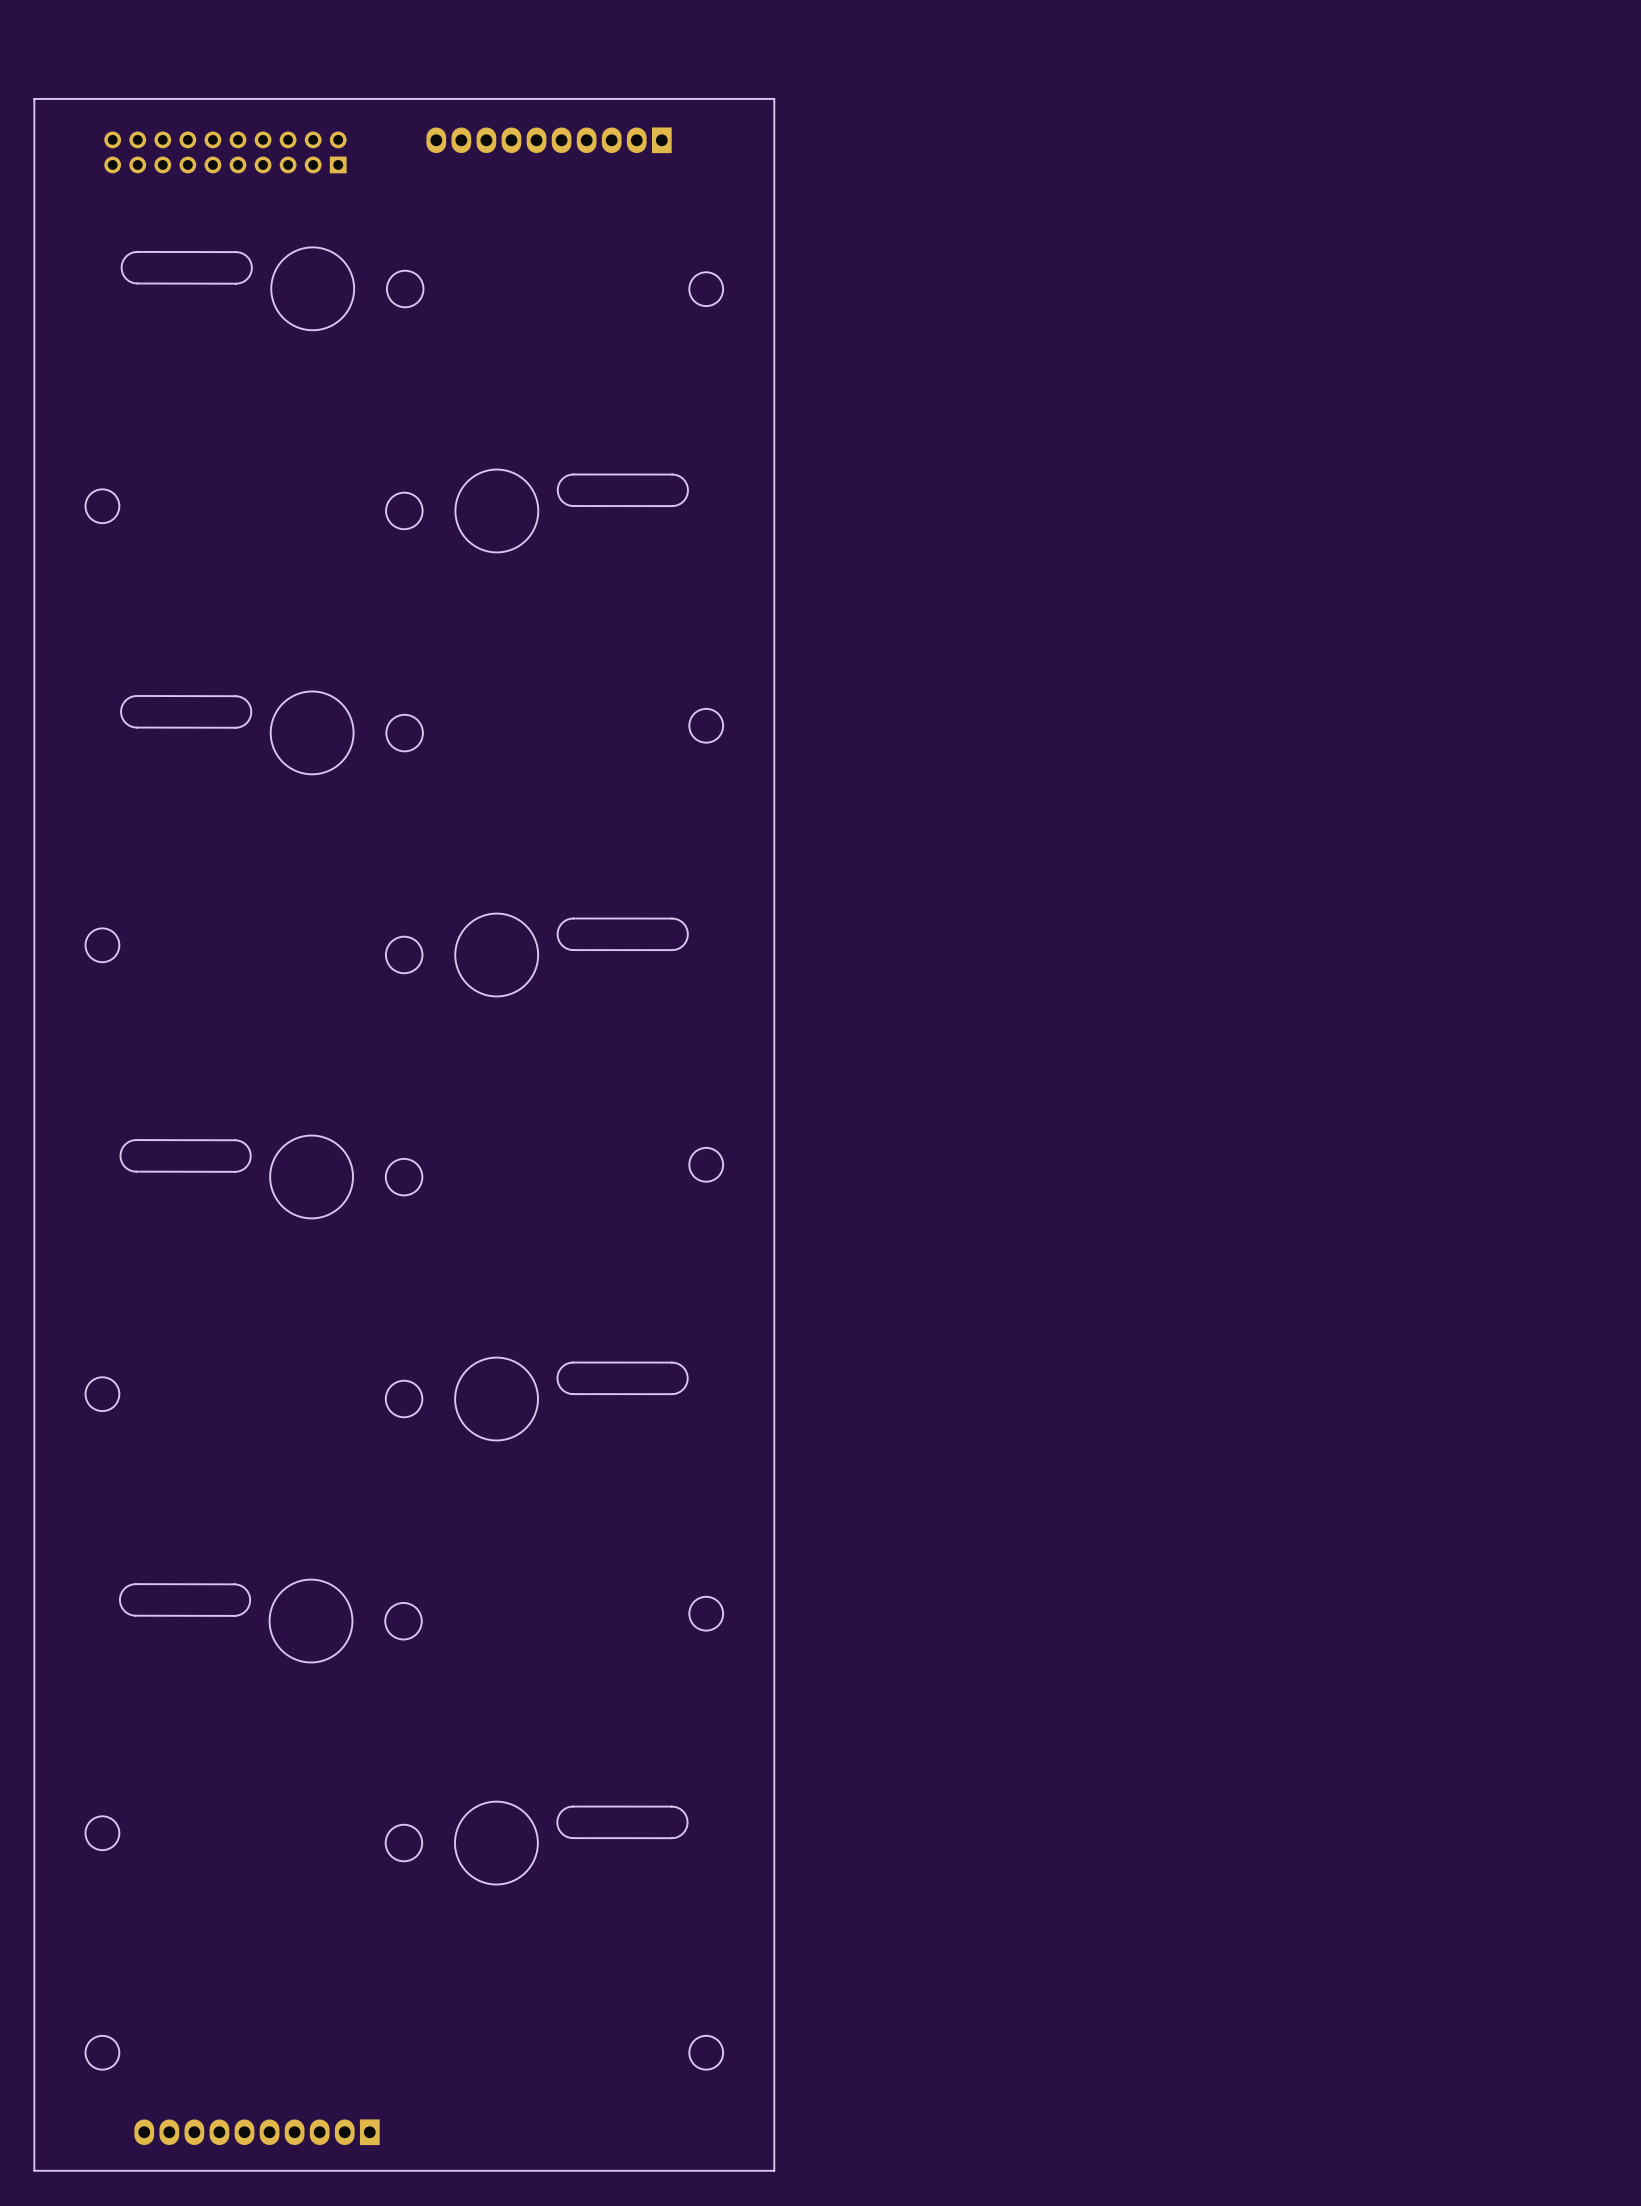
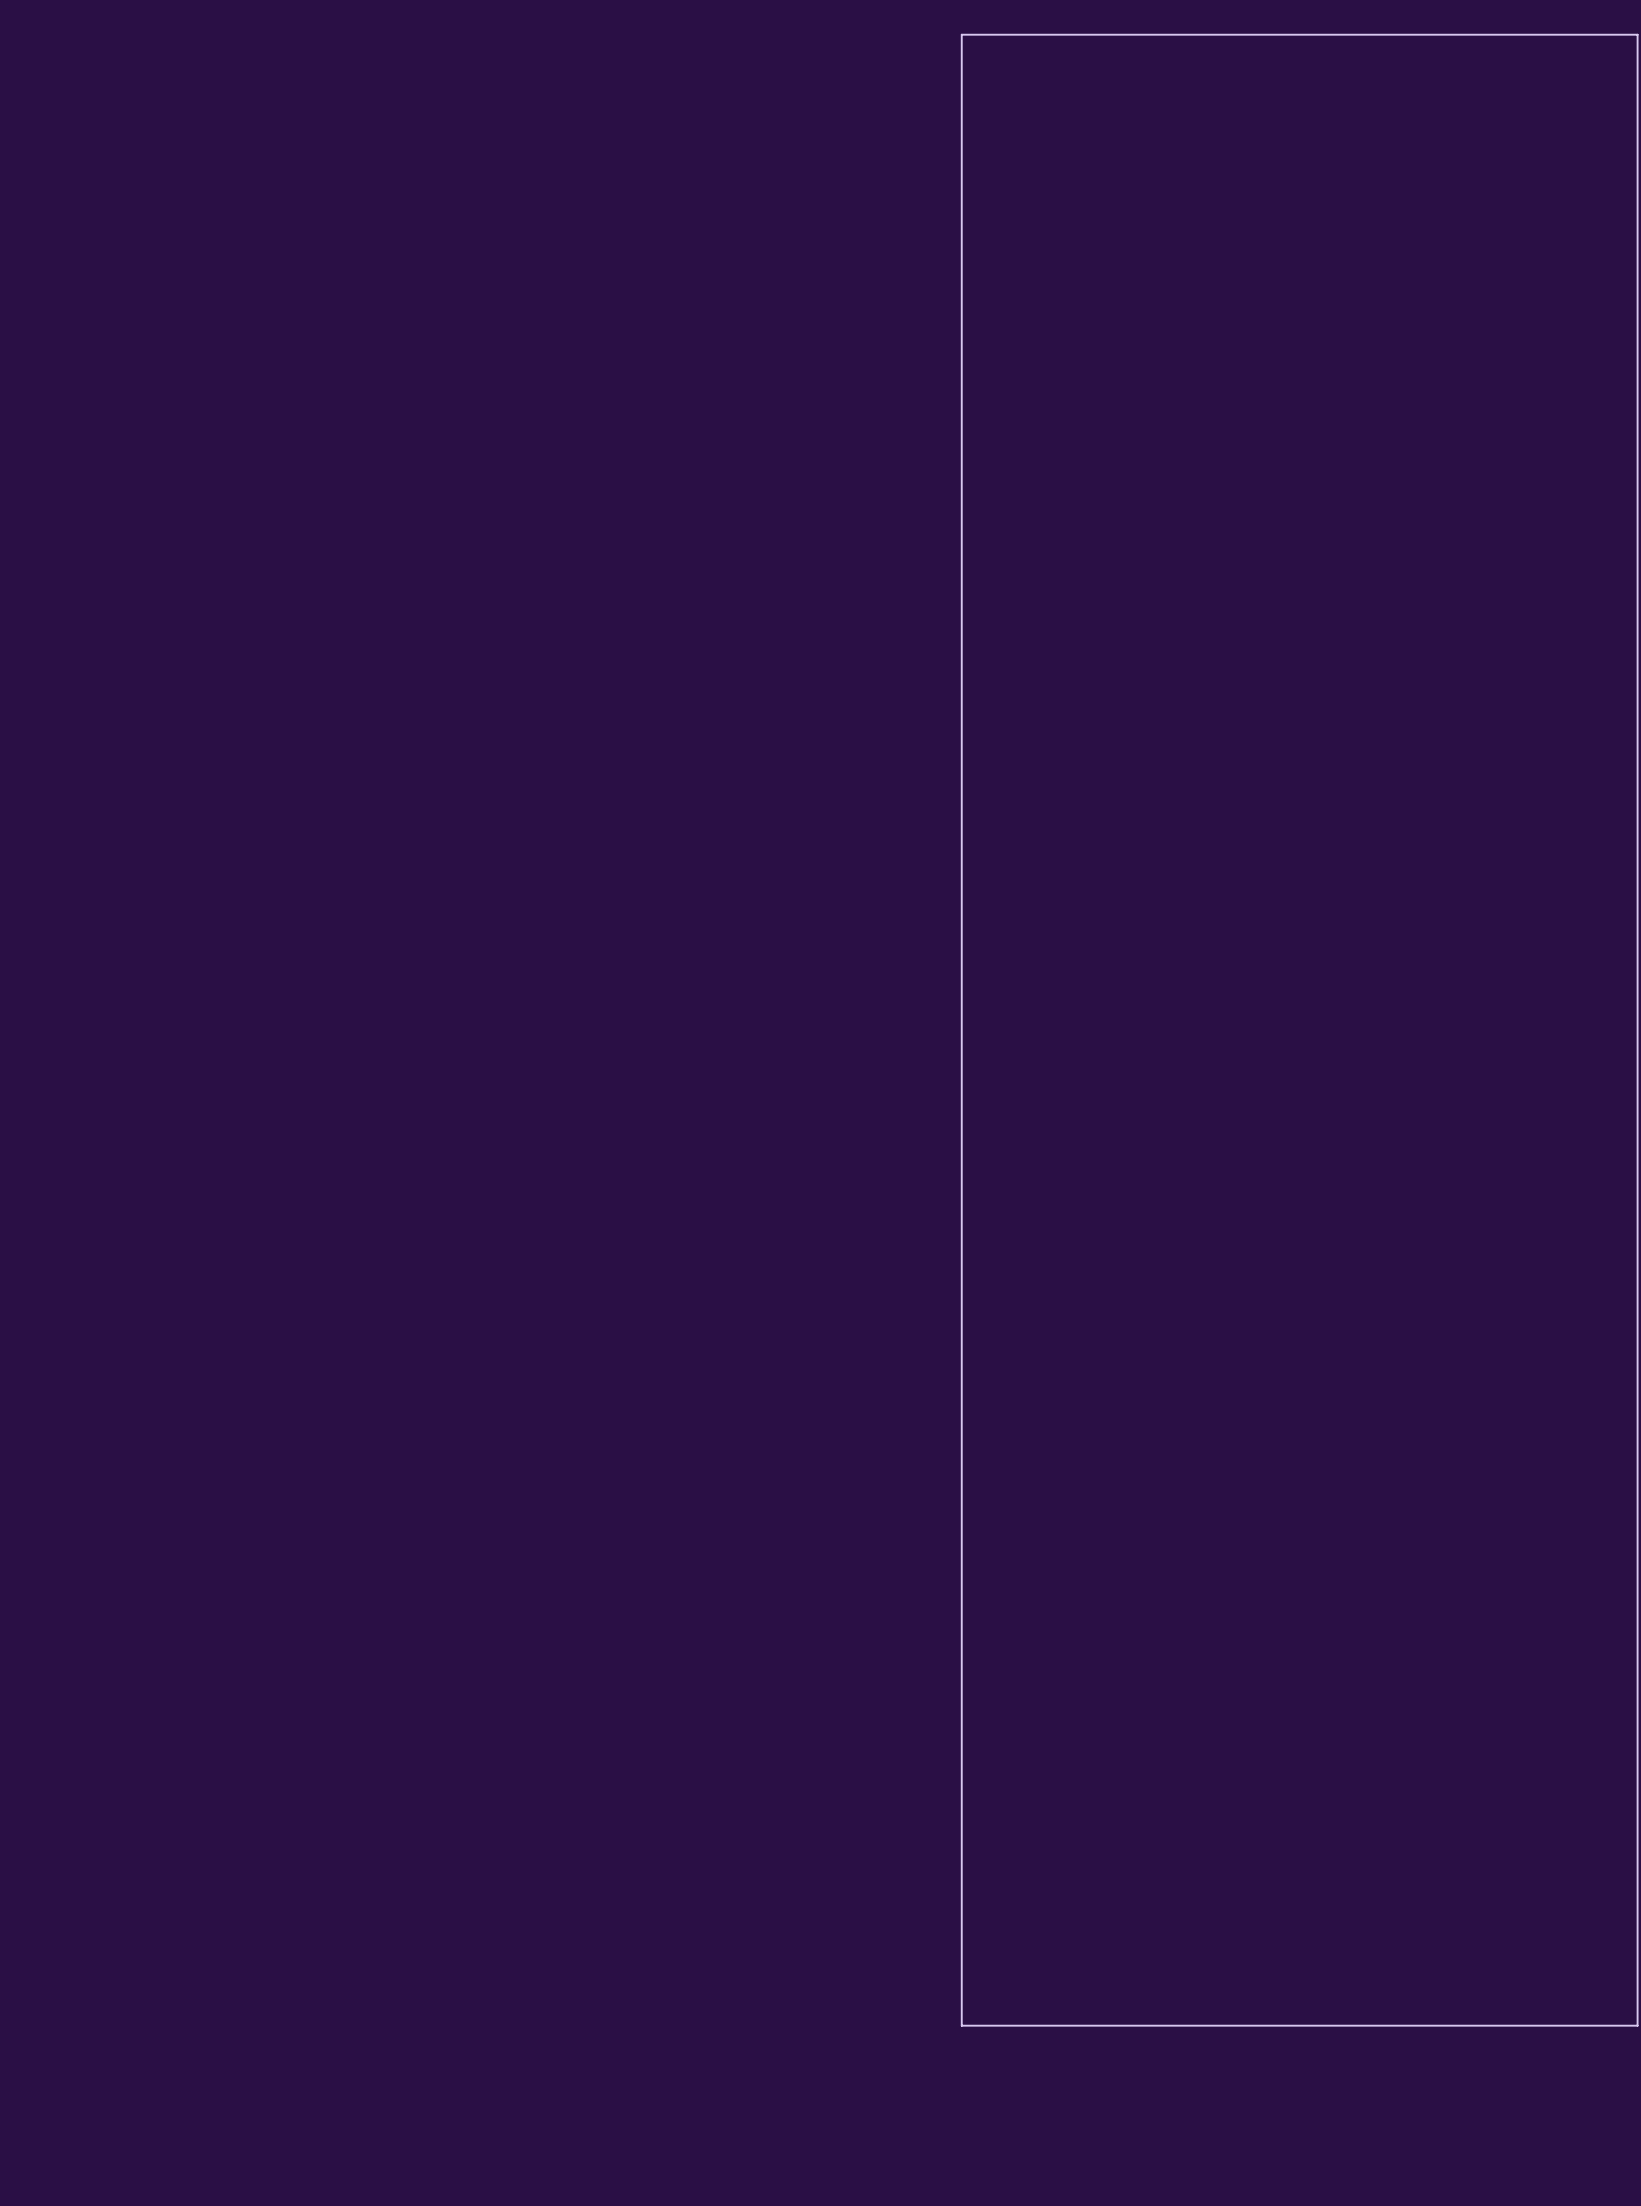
board edge: none -> (1637, 34) (1637, 2025) (961, 2025) (961, 34) (1637, 34)
board edge: (774, 98) (774, 2170) (34, 2170) (34, 98) (774, 98) -> none
part: (549, 140) -> none
part: (225, 152) -> none
round board edge: [270, 246, 355, 331] -> none
board edge: (137, 251) (238, 252) (248, 258) (251, 269) (247, 279) (238, 283) (135, 283) (126, 278) (121, 267) (126, 256) (137, 251) -> none
round board edge: [386, 270, 424, 308] -> none
round board edge: [688, 271, 724, 307] -> none
round board edge: [454, 469, 539, 553] -> none
board edge: (573, 474) (674, 474) (684, 480) (687, 492) (683, 501) (674, 505) (571, 505) (561, 499) (557, 490) (562, 479) (573, 474) -> none
round board edge: [85, 488, 120, 524] -> none
round board edge: [385, 492, 424, 530] -> none
round board edge: [270, 690, 355, 775] -> none
board edge: (136, 695) (237, 696) (248, 702) (251, 714) (246, 723) (237, 727) (134, 727) (124, 721) (121, 711) (125, 700) (136, 695) -> none
round board edge: [688, 708, 724, 744] -> none
round board edge: [385, 714, 424, 752] -> none
round board edge: [454, 913, 539, 997] -> none
board edge: (672, 918) (571, 918) (560, 924) (557, 936) (562, 945) (571, 949) (674, 949) (683, 945) (687, 934) (683, 923) (672, 918) -> none
round board edge: [85, 927, 120, 963] -> none
round board edge: [385, 936, 423, 974] -> none
round board edge: [269, 1135, 354, 1219] -> none
board edge: (136, 1140) (237, 1140) (247, 1146) (250, 1158) (246, 1167) (236, 1171) (134, 1171) (123, 1165) (120, 1153) (126, 1143) (136, 1140) -> none
round board edge: [688, 1147, 724, 1183] -> none
round board edge: [385, 1158, 423, 1196] -> none
round board edge: [454, 1357, 539, 1441] -> none
board edge: (573, 1362) (673, 1362) (684, 1368) (687, 1380) (683, 1389) (673, 1394) (571, 1393) (560, 1387) (557, 1376) (563, 1365) (573, 1362) -> none
round board edge: [85, 1376, 120, 1412] -> none
round board edge: [385, 1380, 423, 1418] -> none
round board edge: [269, 1579, 353, 1663] -> none
board edge: (135, 1584) (236, 1584) (246, 1590) (250, 1602) (245, 1611) (236, 1615) (133, 1615) (123, 1609) (119, 1599) (124, 1588) (135, 1584) -> none
round board edge: [688, 1596, 724, 1632] -> none
round board edge: [384, 1602, 423, 1640] -> none
round board edge: [454, 1801, 539, 1885] -> none
board edge: (671, 1806) (571, 1806) (560, 1812) (557, 1824) (561, 1833) (571, 1837) (673, 1838) (684, 1832) (687, 1820) (681, 1809) (671, 1806) -> none
round board edge: [85, 1815, 120, 1851] -> none
round board edge: [385, 1824, 423, 1862] -> none
round board edge: [85, 2035, 120, 2071] -> none
round board edge: [688, 2035, 724, 2071] -> none
part: (257, 2132) -> none

